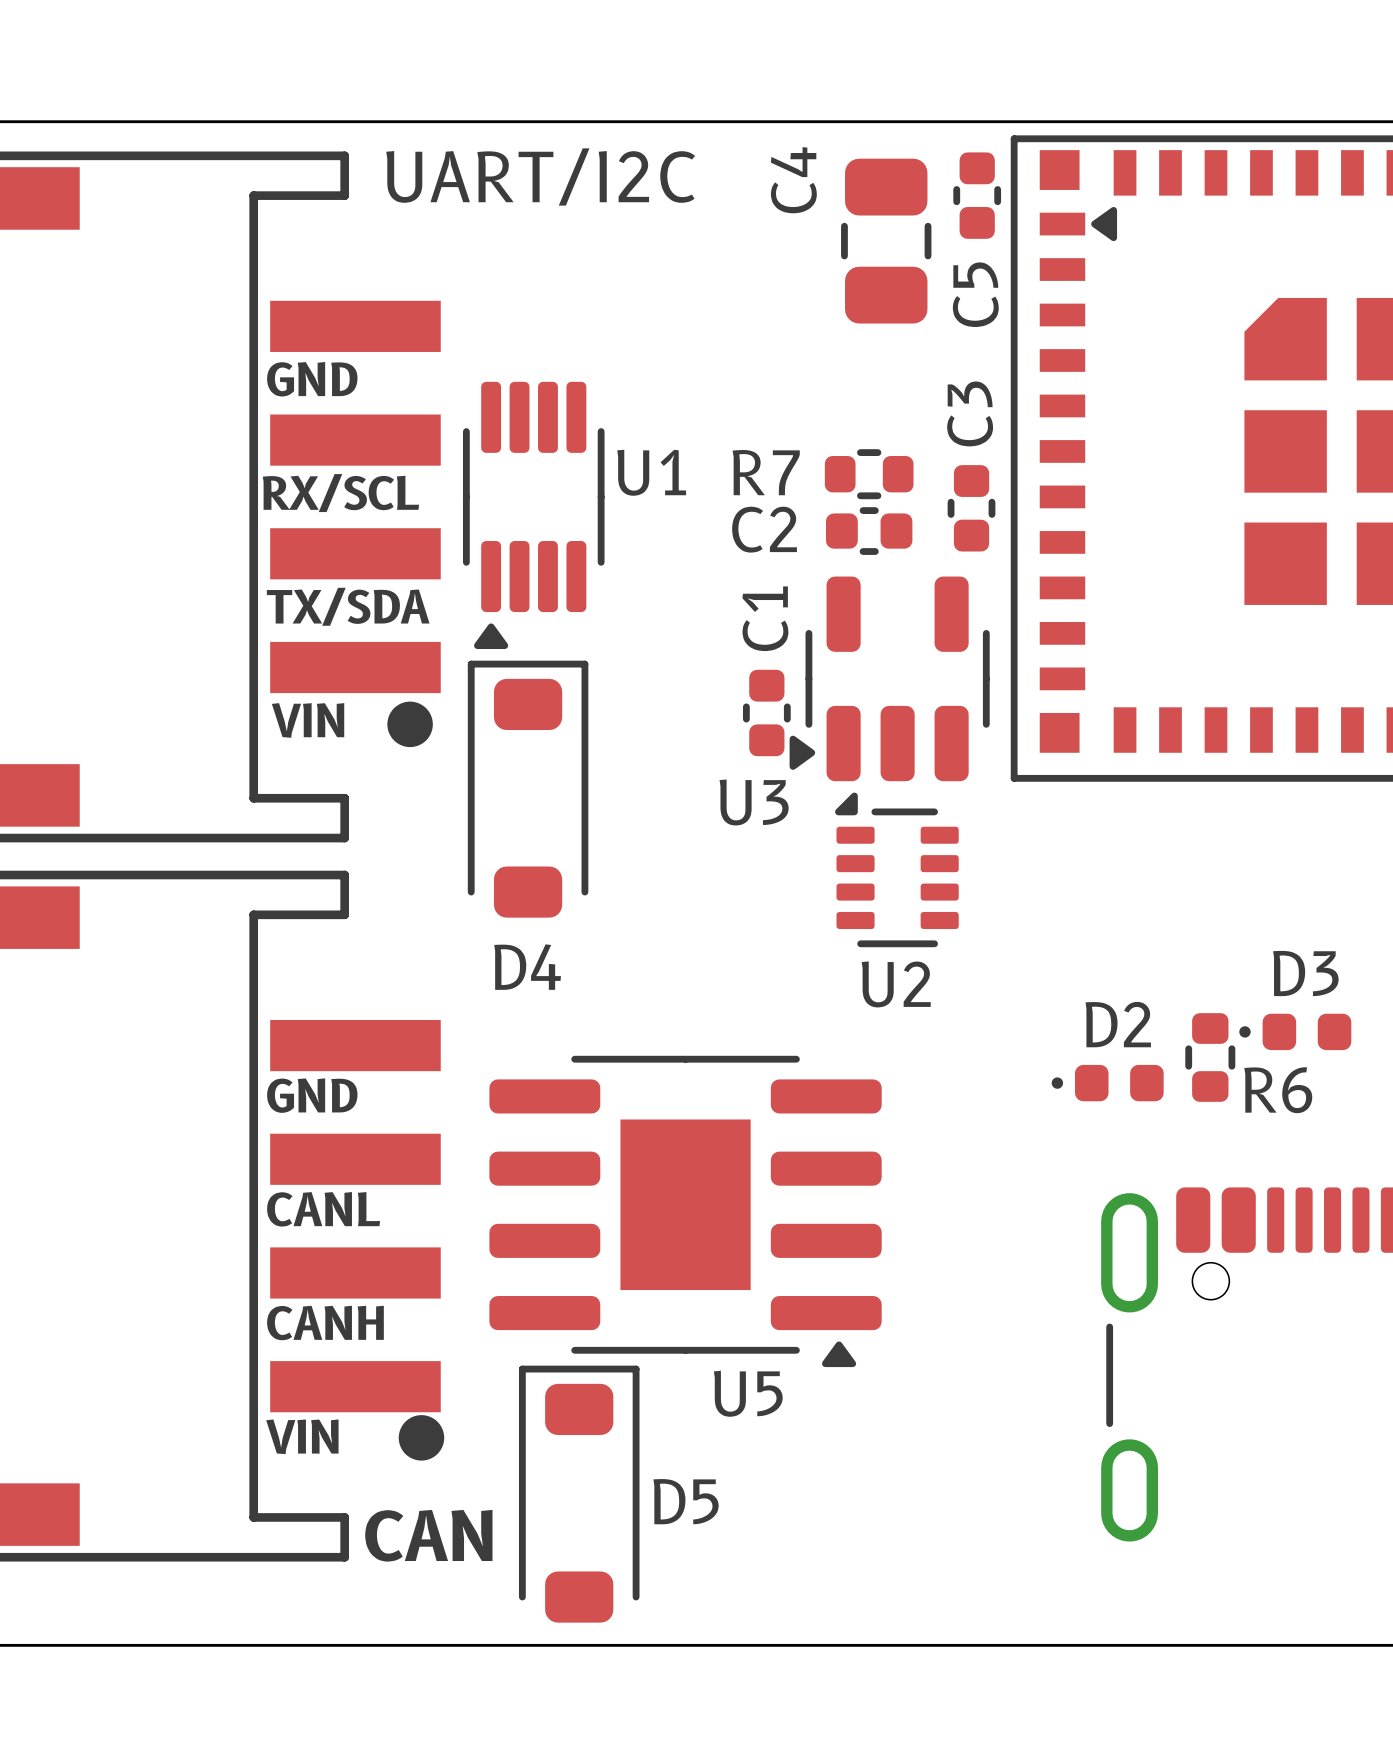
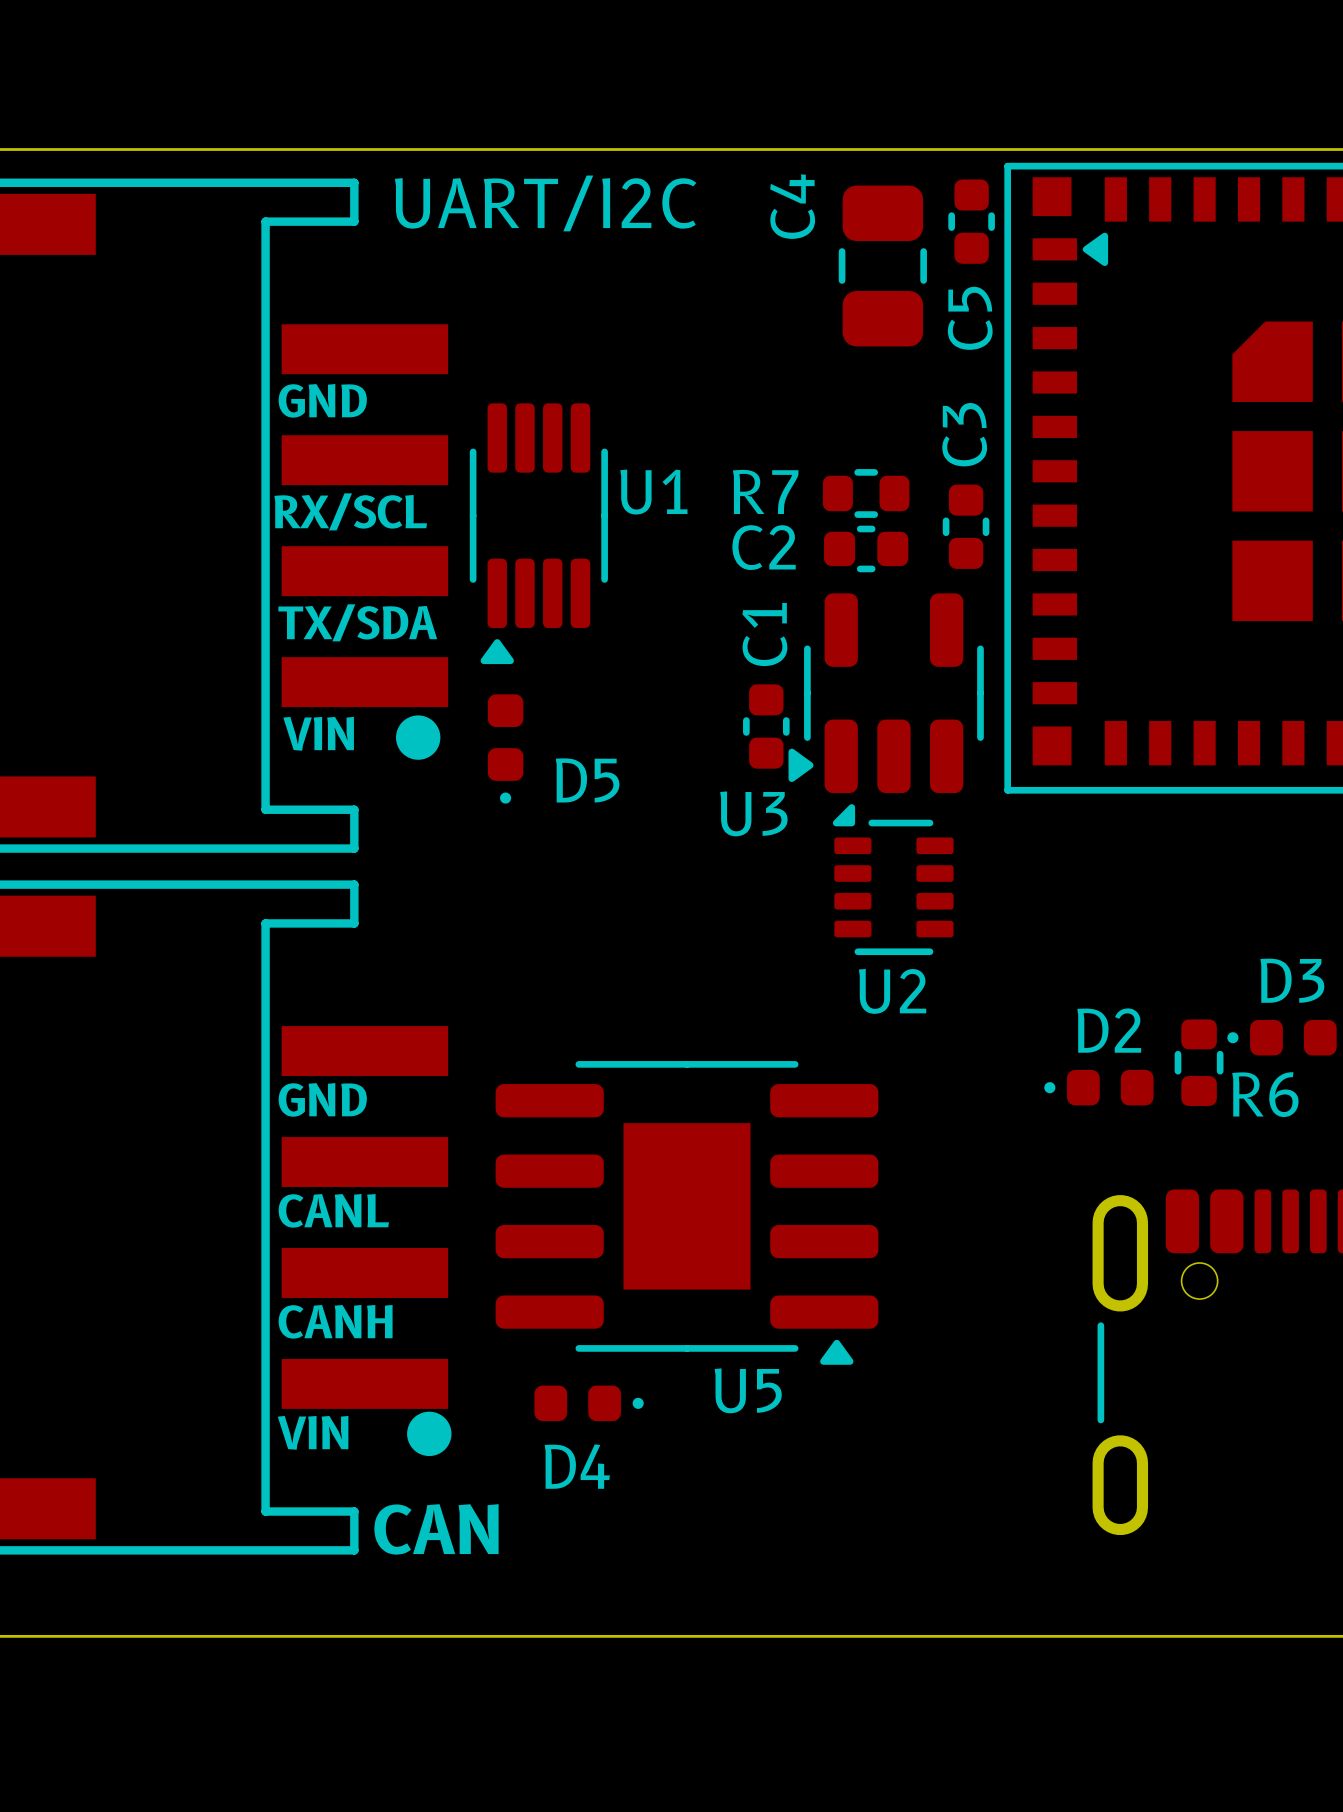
D4 footprint: [467, 660, 589, 918] -> [534, 1385, 644, 1422]
D4 name position: D4 (527, 967) -> D4 (577, 1466)
D5 footprint: [518, 1365, 640, 1623] -> [487, 694, 524, 804]

